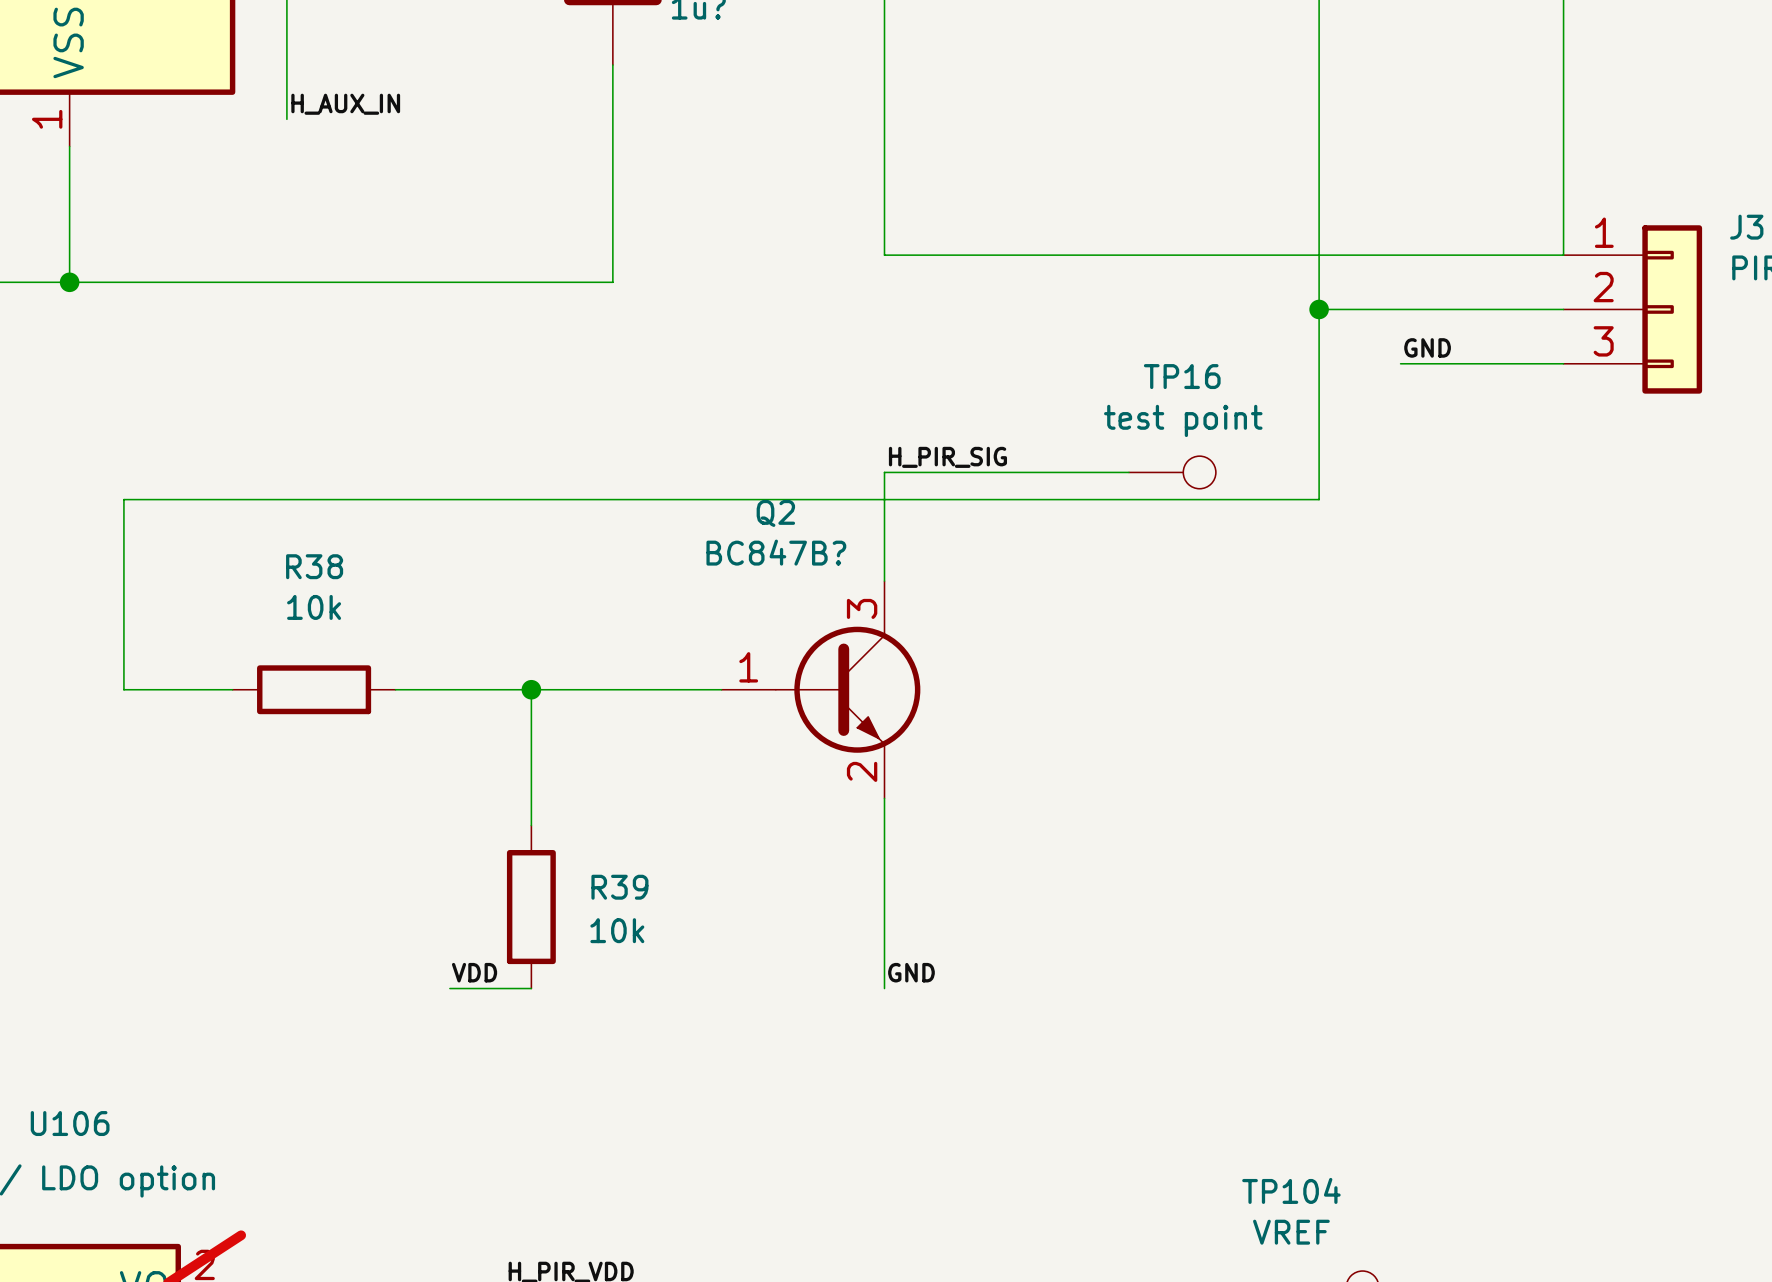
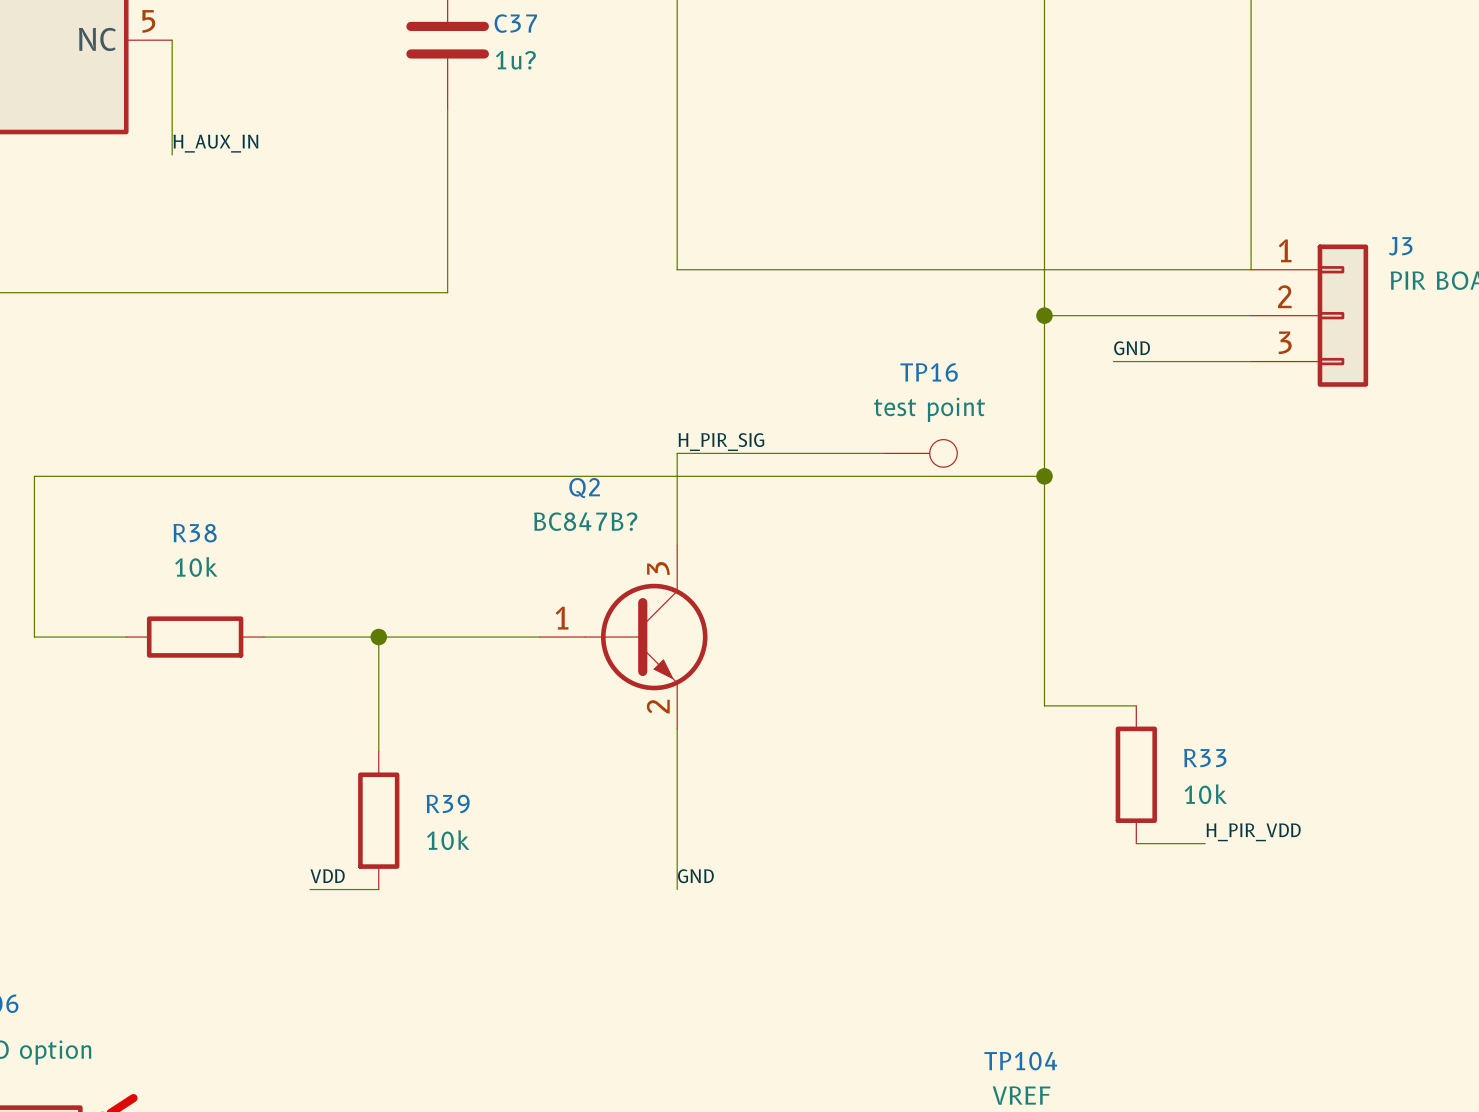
wire: none -> (1044, 476) (1044, 705) (1136, 705)
junction: none -> (1044, 476)
R33: none -> 10k (1136, 774)
label: none -> H_PIR_VDD (1253, 832)
wire: none -> (1136, 843) (1205, 843)

